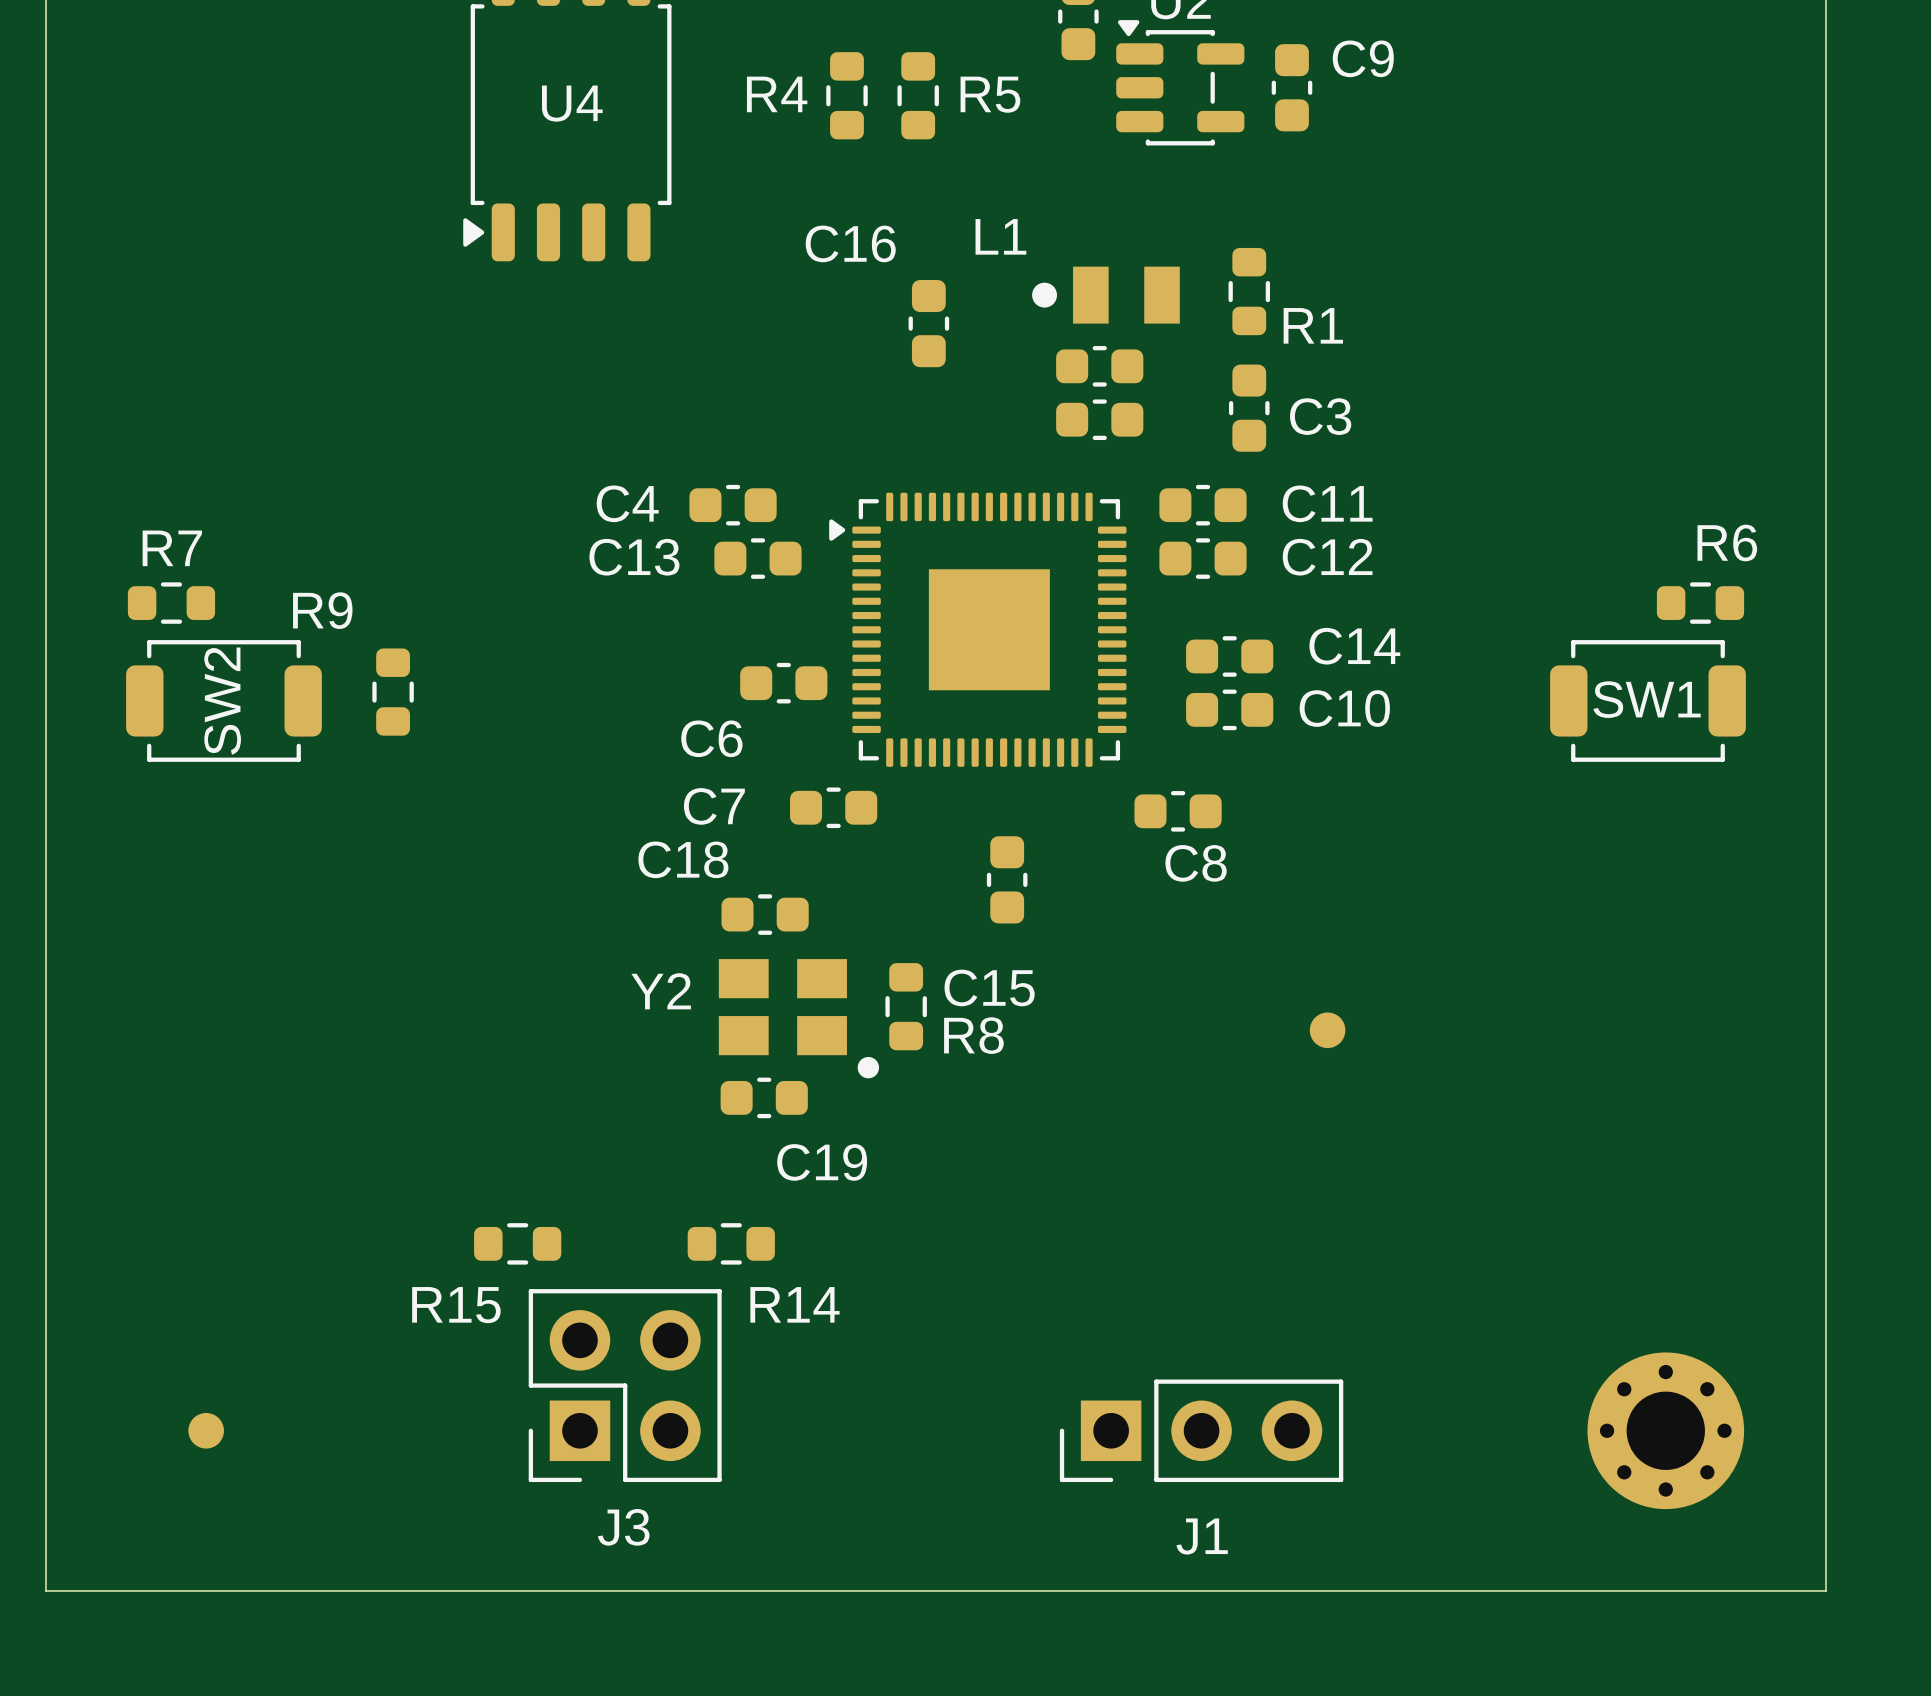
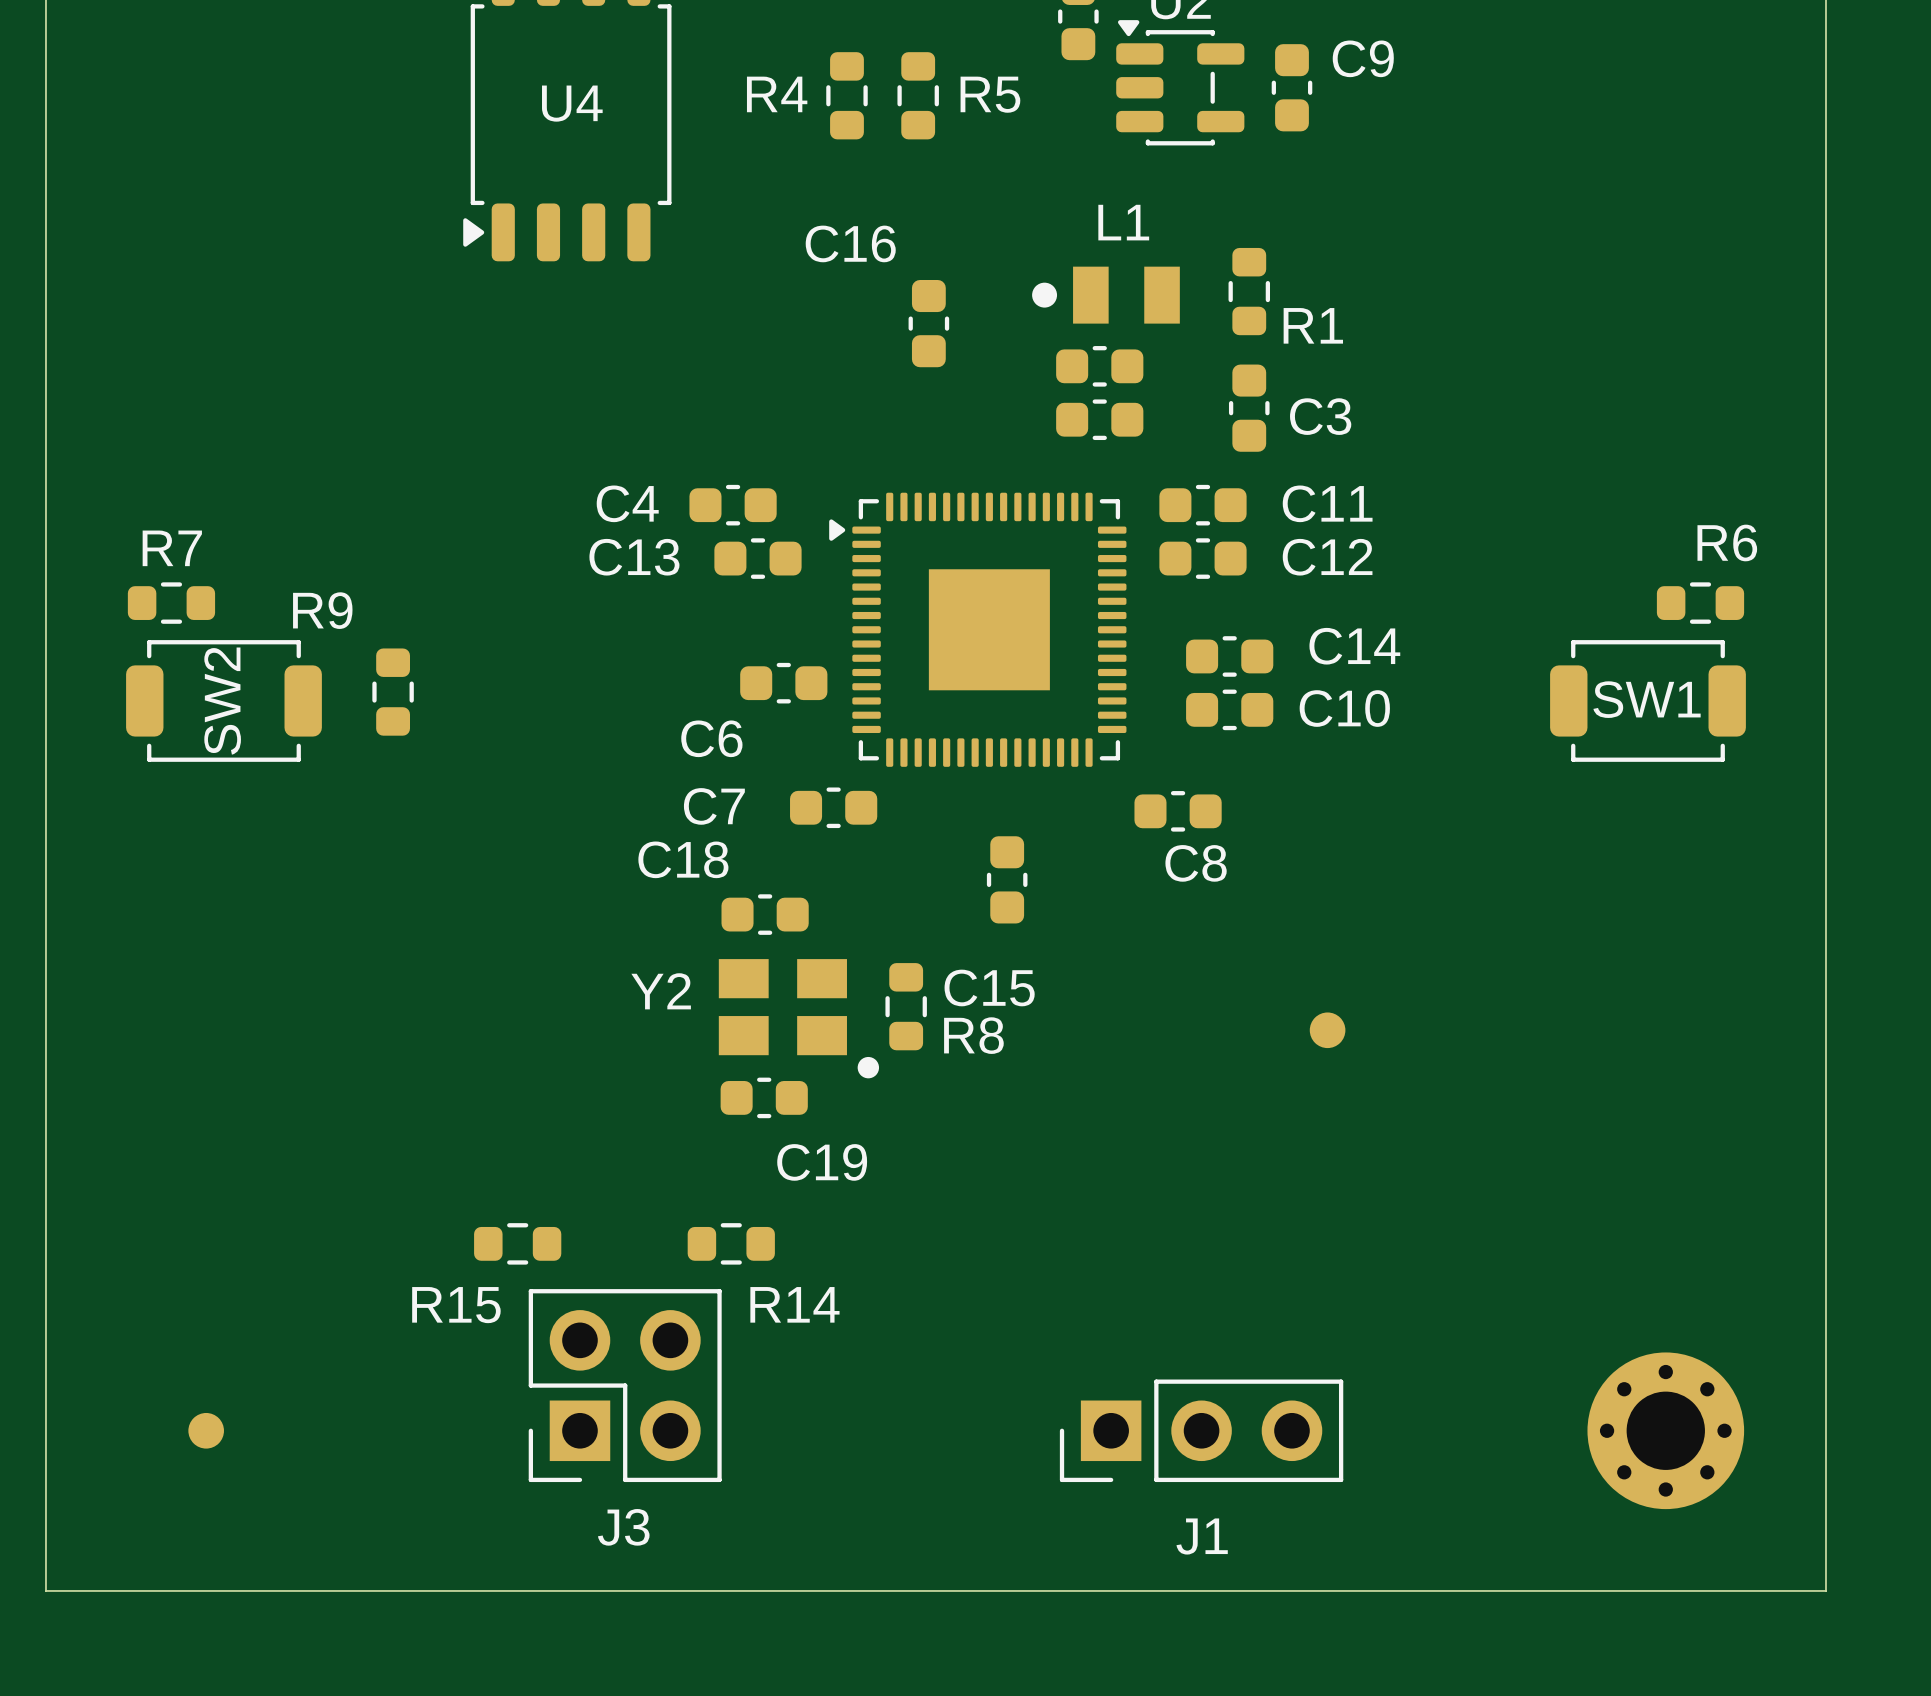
L1 name position: L1 (1000, 236) -> L1 (1123, 222)

